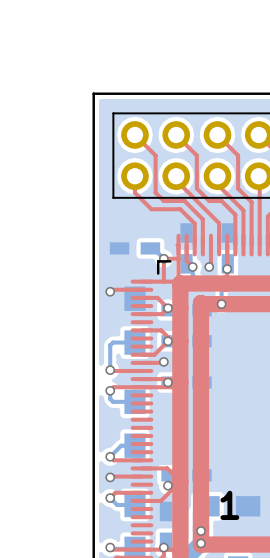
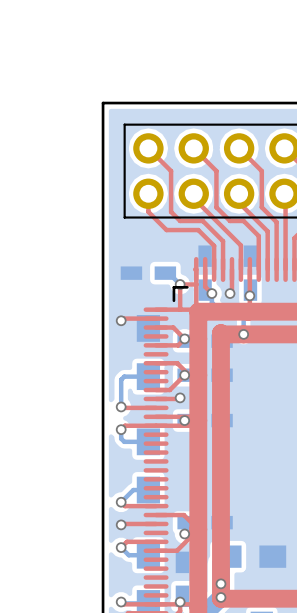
text: 1 (229, 505) -> none

